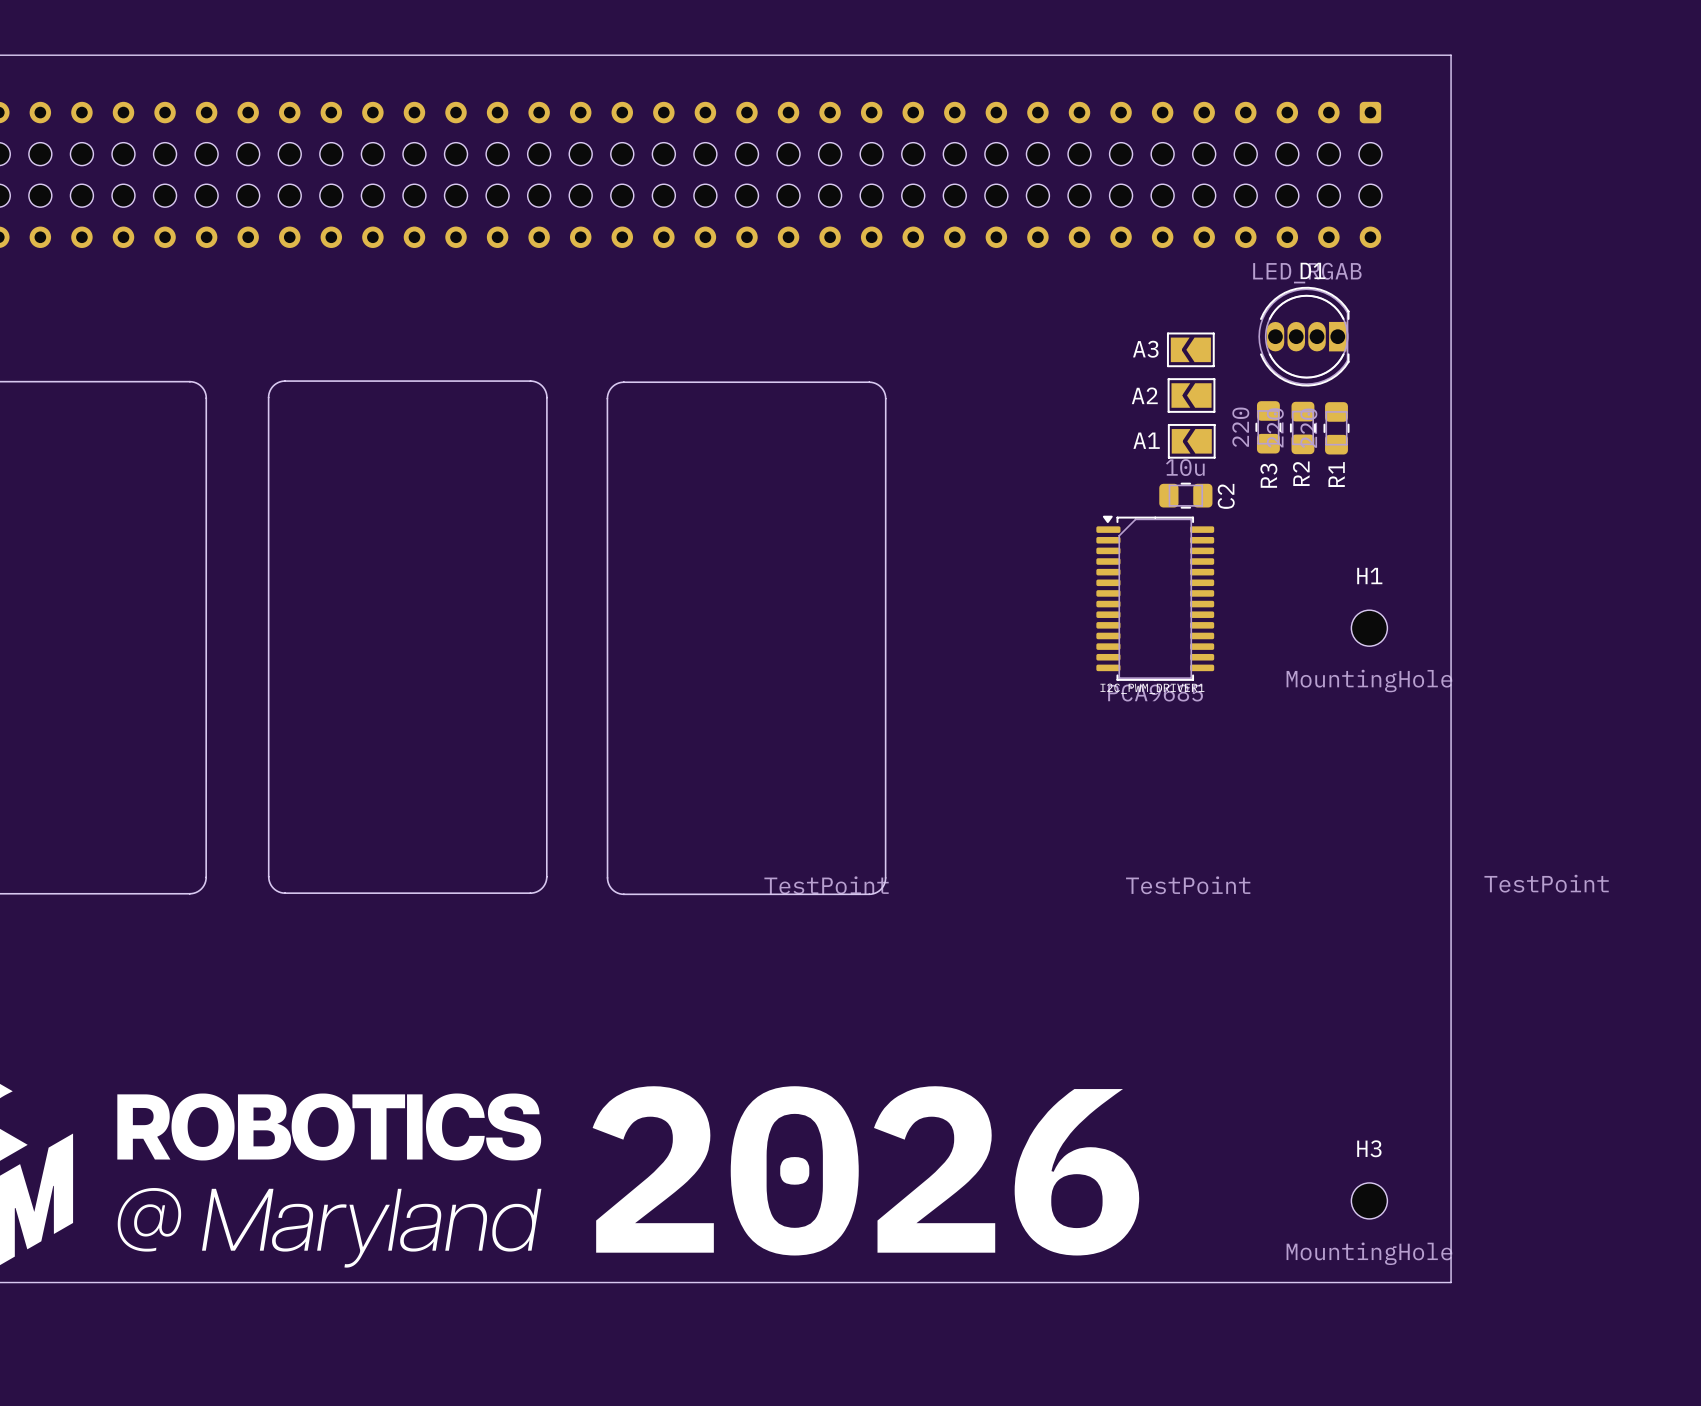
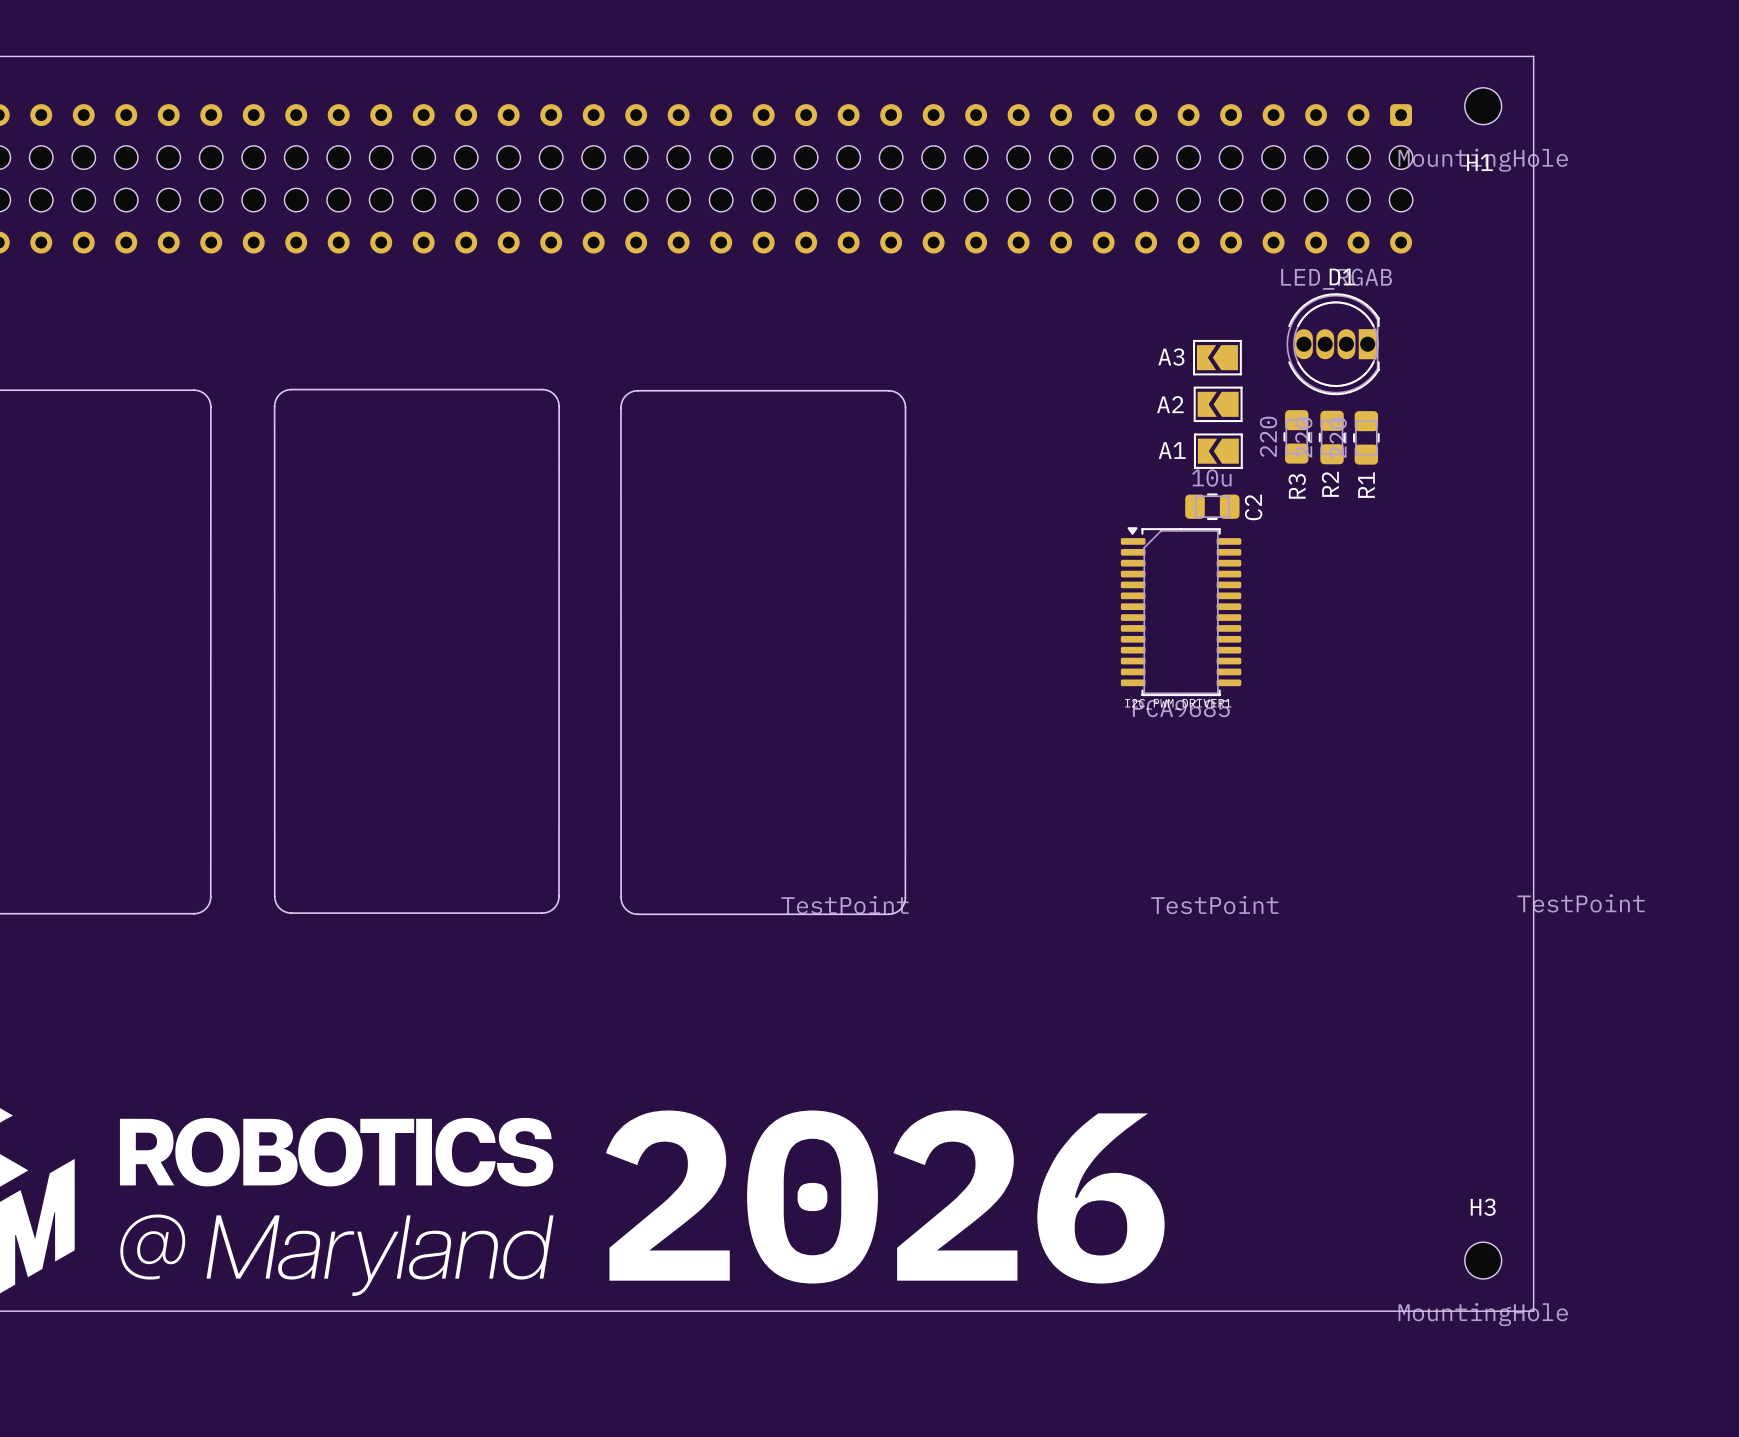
board edge: (1451, 55) (1451, 1282) -> (1483, 56) (1533, 56) (1533, 1311) (1483, 1311)
H1 name position: H1 (1369, 576) -> H1 (1479, 162)
H1 position: (1369, 628) -> (1483, 106)
H3 position: (1369, 1200) -> (1483, 1260)

